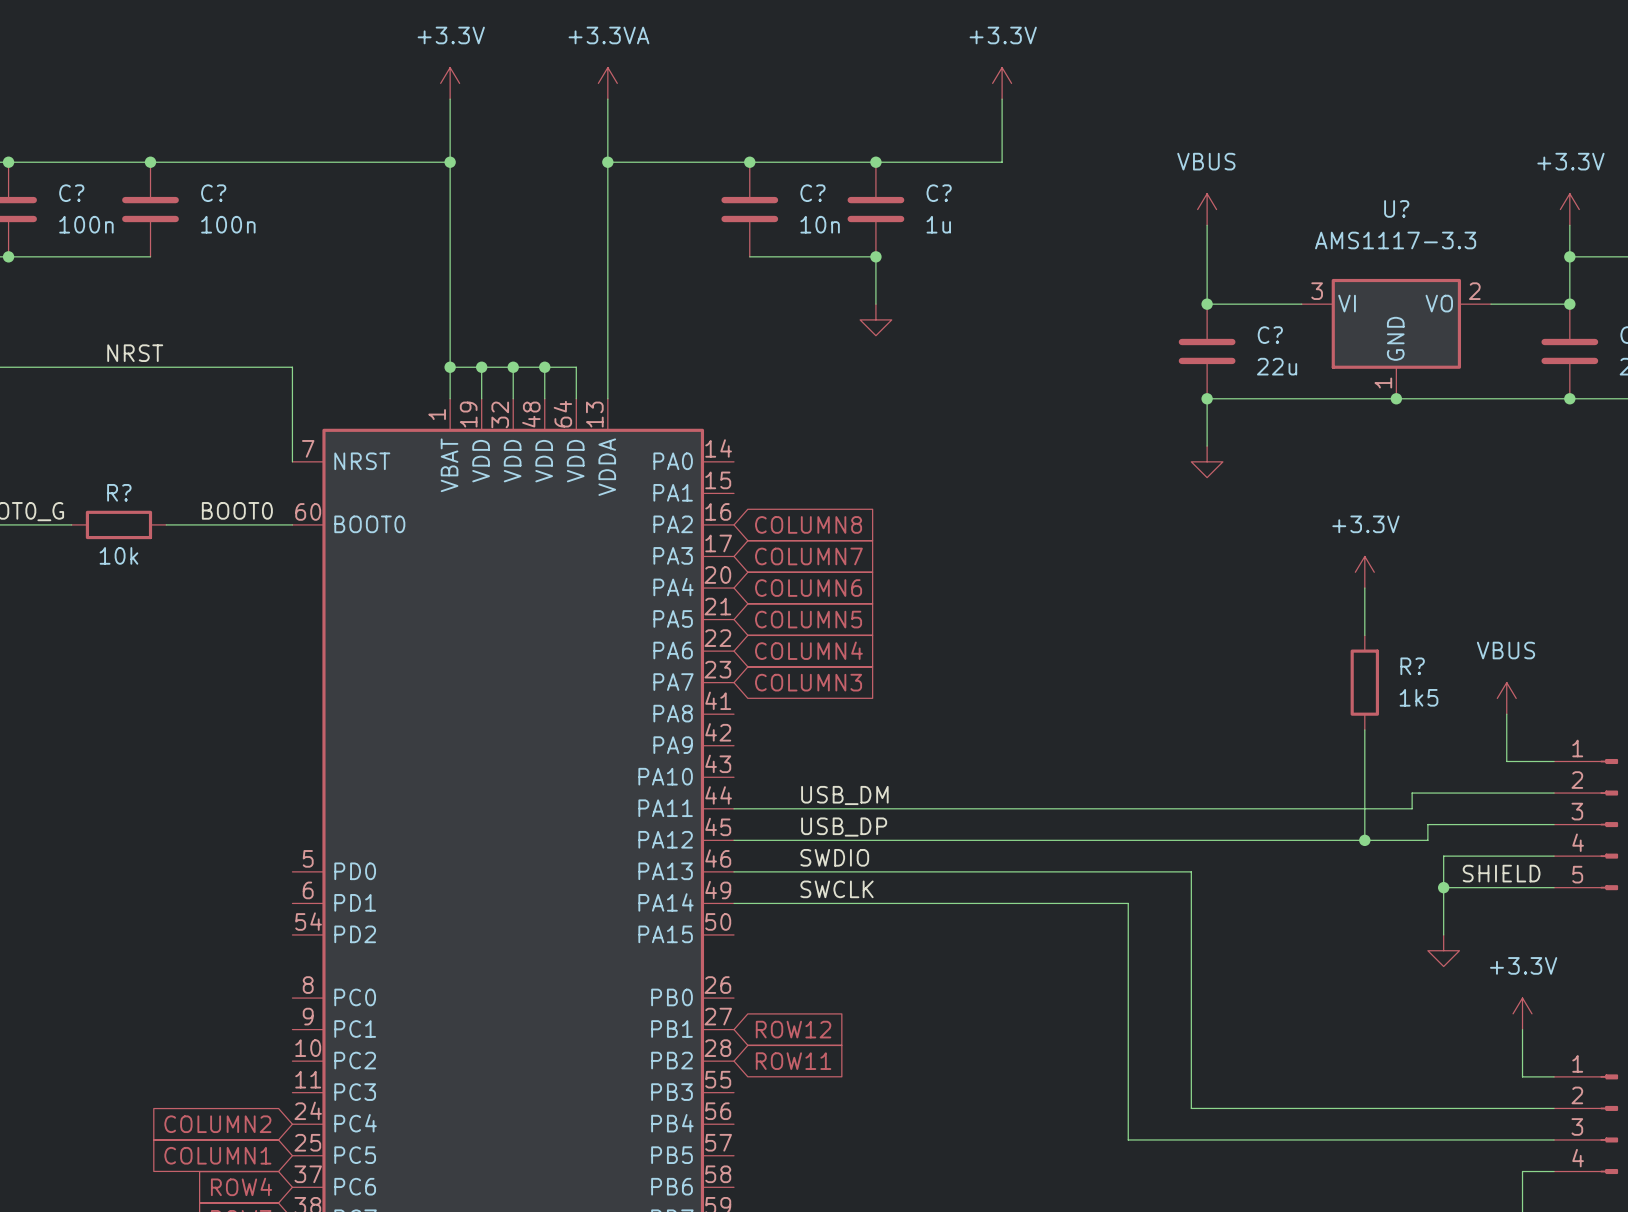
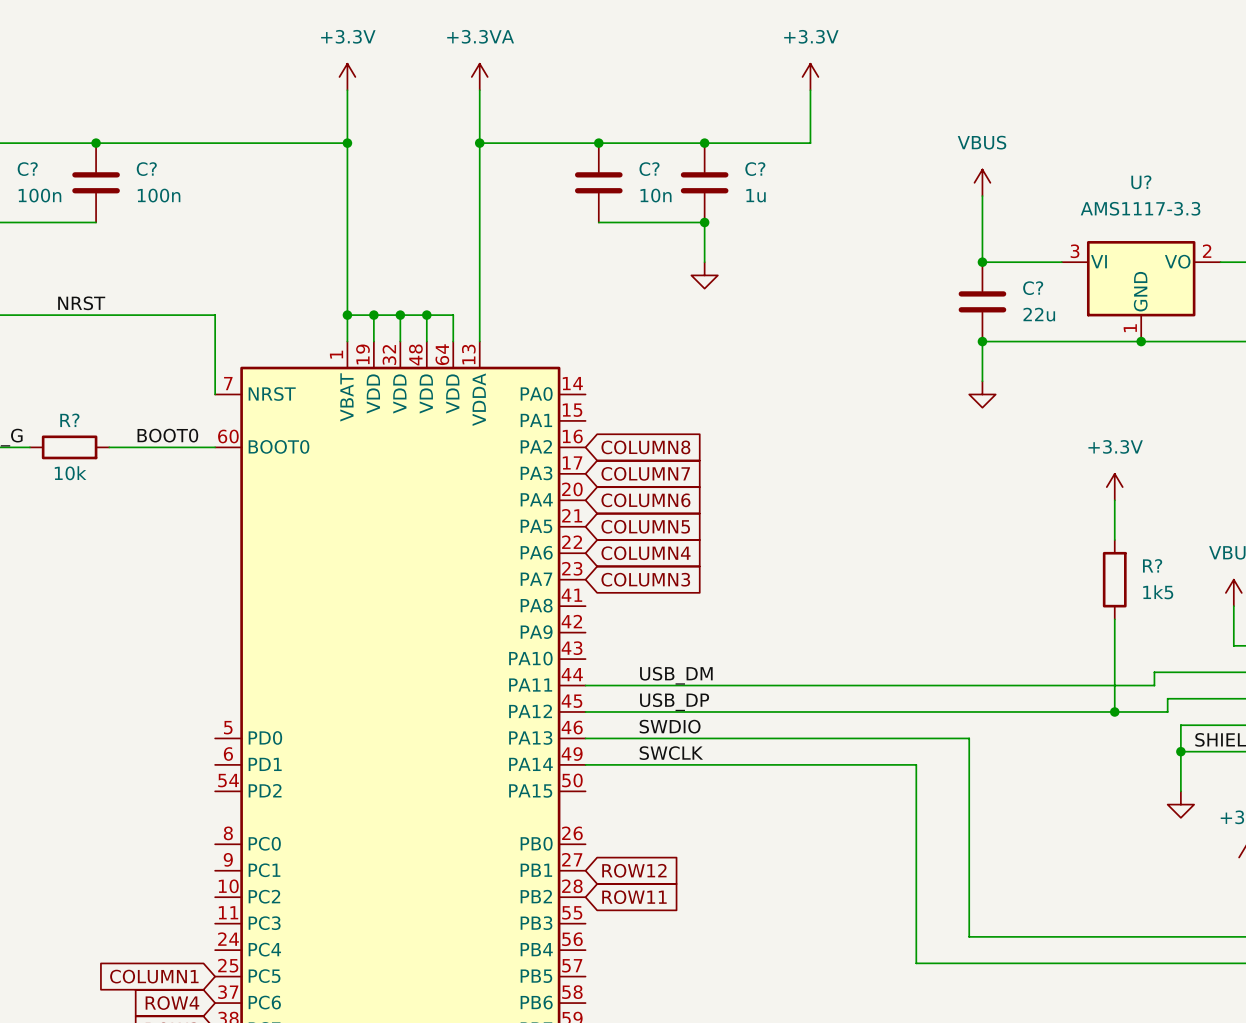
global label: COLUMN2 (217, 1124) -> none

